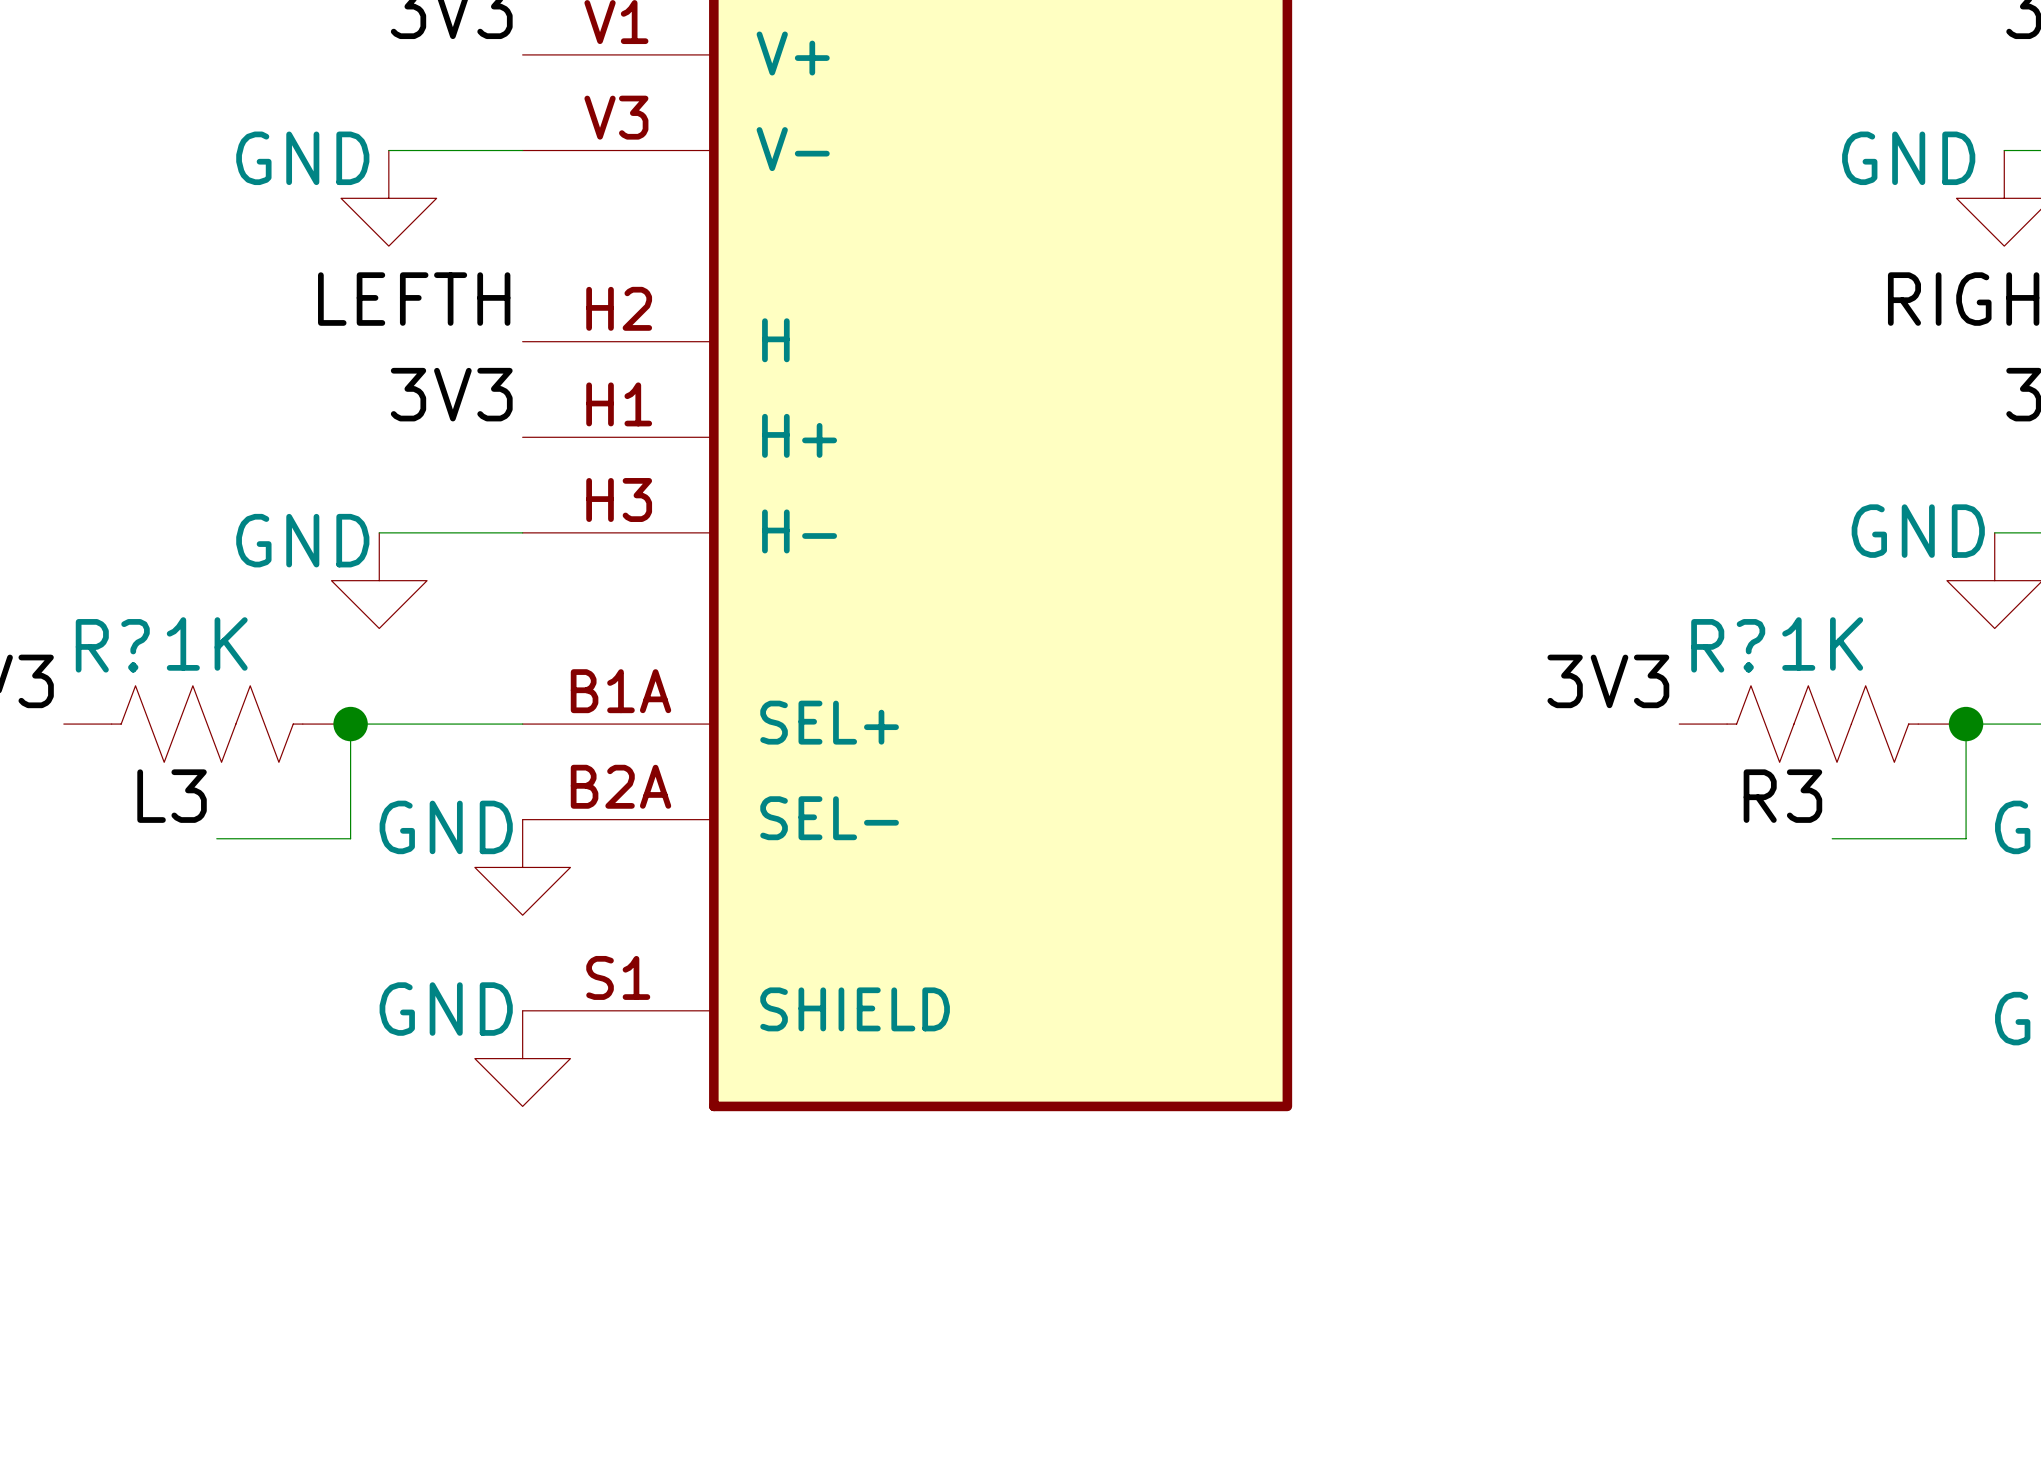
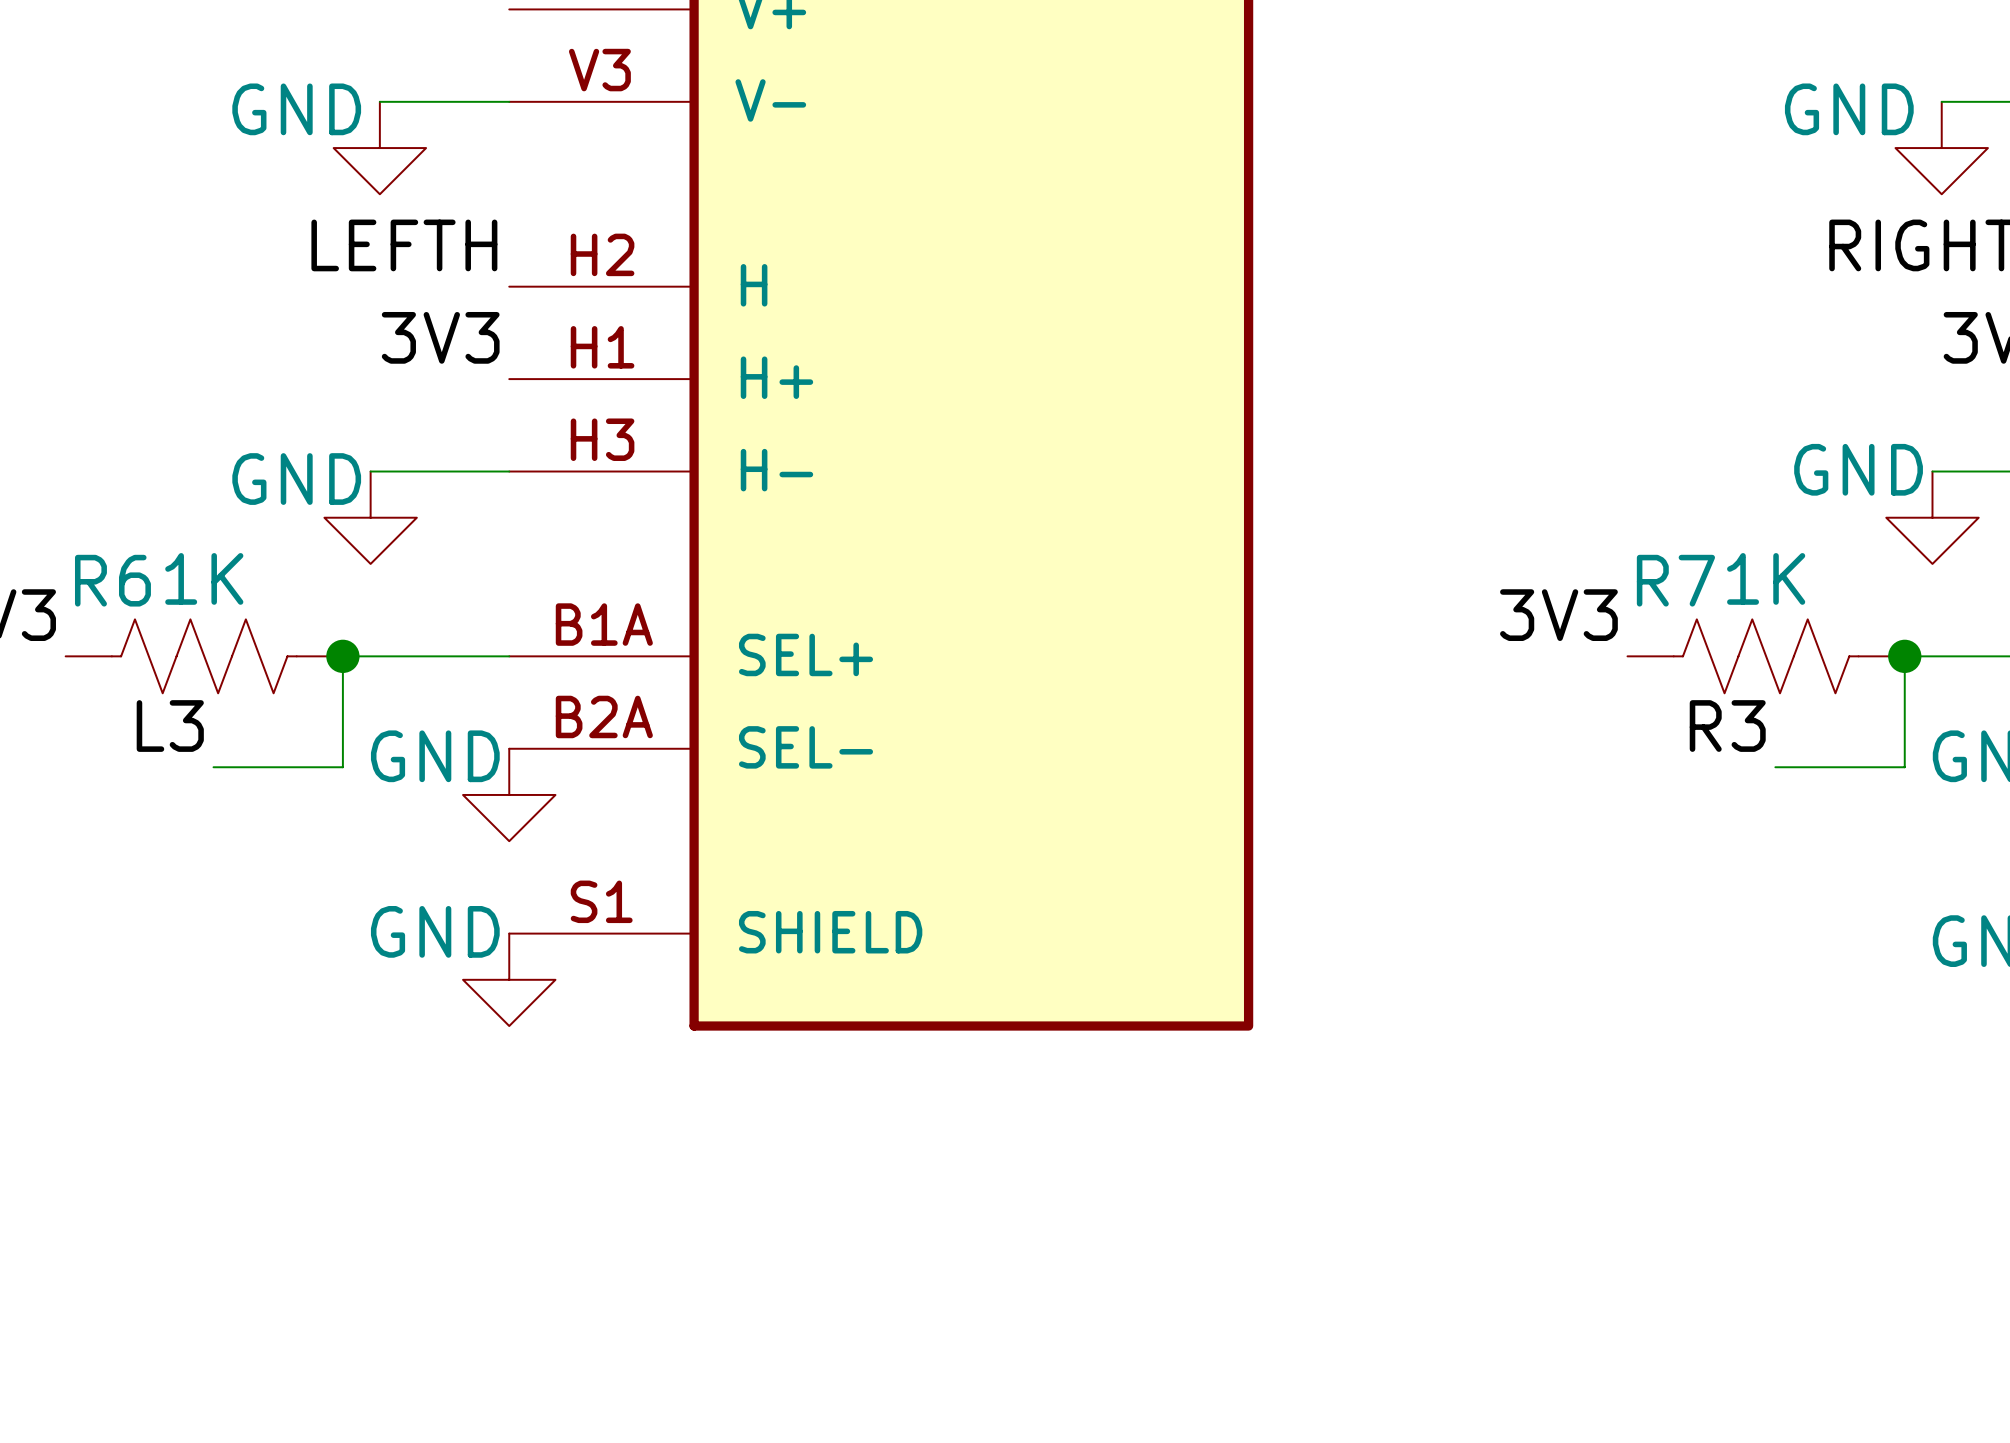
R? name: R? (112, 645) -> R6 (112, 580)
R? name: R? (1728, 645) -> R7 (1675, 580)

